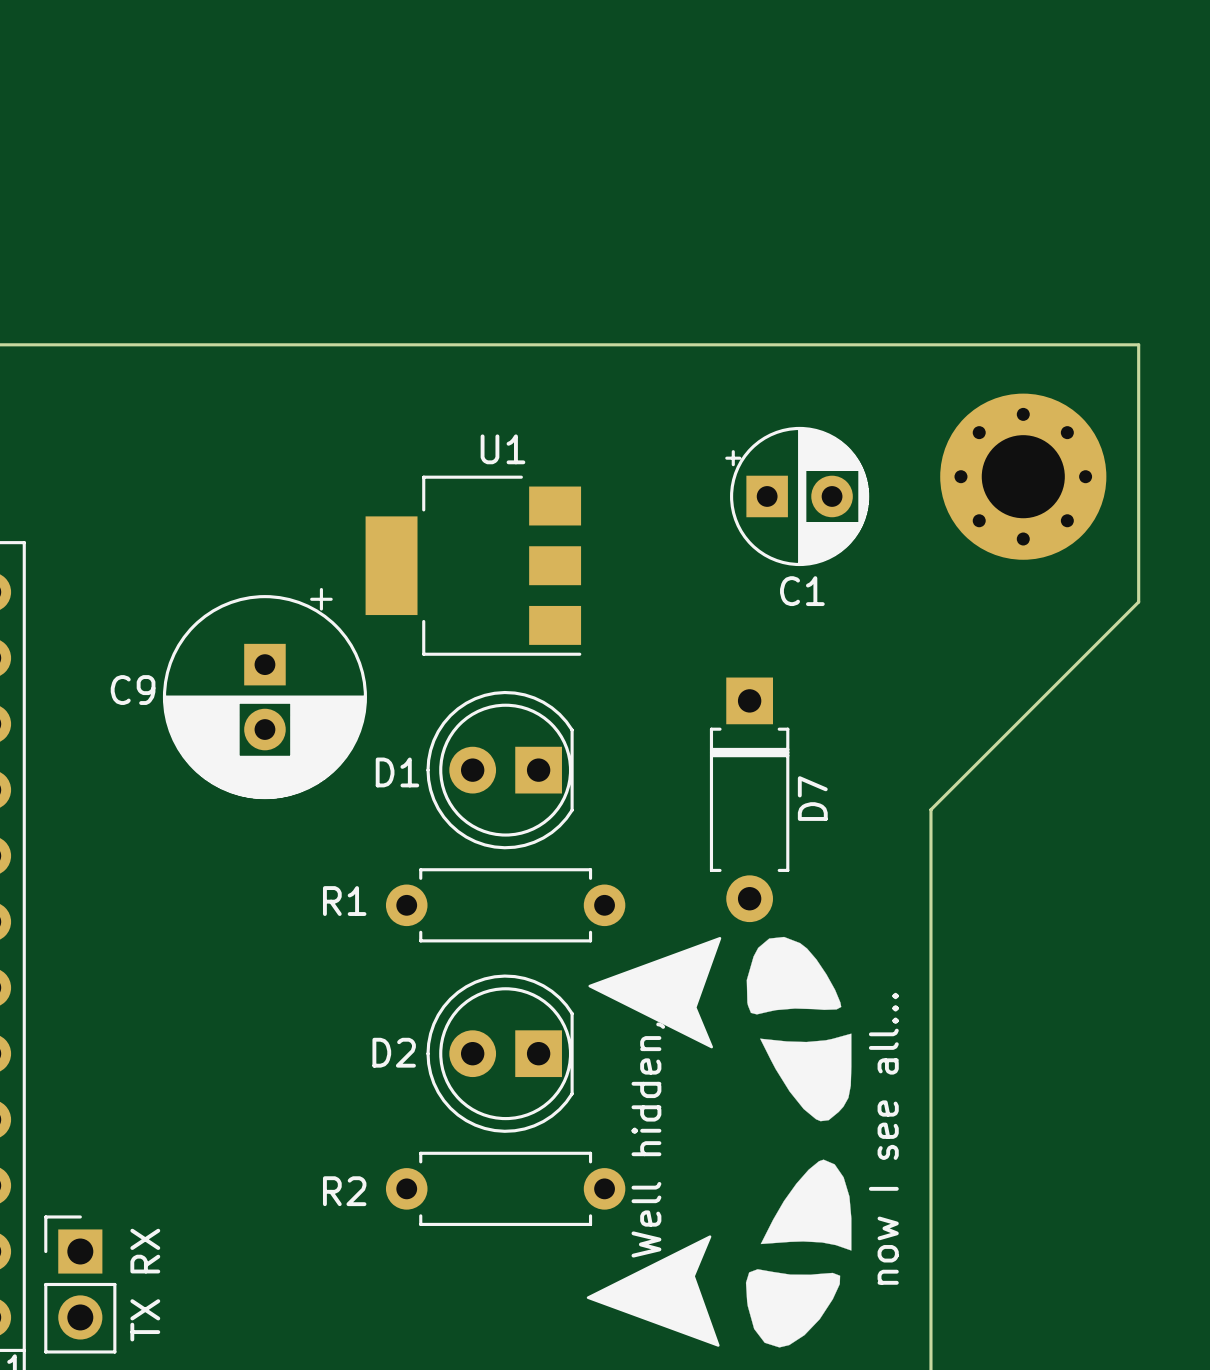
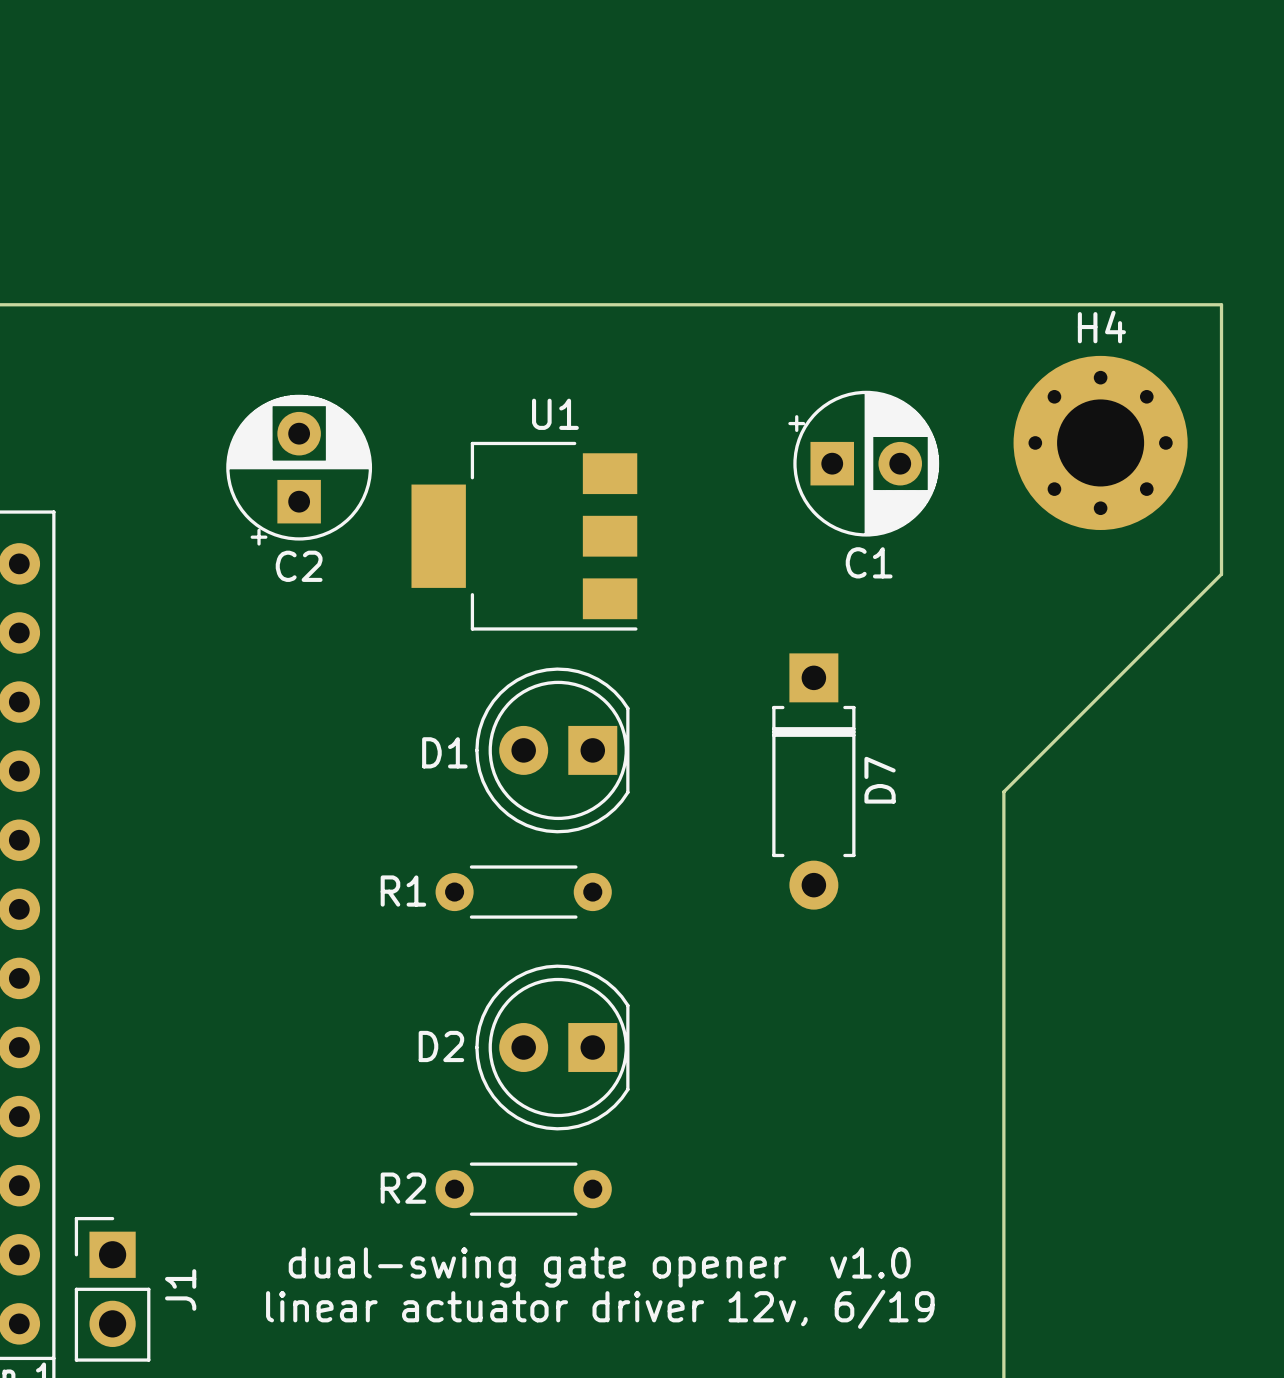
H4 name: none -> H4 (1101, 327)
C2: none -> (299, 470)
C9: (264, 693) -> none
R1 footprint: [385, 868, 626, 943] -> [435, 865, 612, 919]
drawing: [586, 936, 852, 1348] -> none
text: now I see all... (883, 1138) -> none
text: Well hidden, (648, 1140) -> none
R2 footprint: [385, 1151, 626, 1226] -> [435, 1162, 612, 1216]
text: none -> dual-swing gate opener v1.0 (599, 1267)
J1 name: none -> J1 (180, 1289)
text: TX RX (145, 1285) -> none
text: none -> linear actuator driver 12v, 6/19 (600, 1309)

